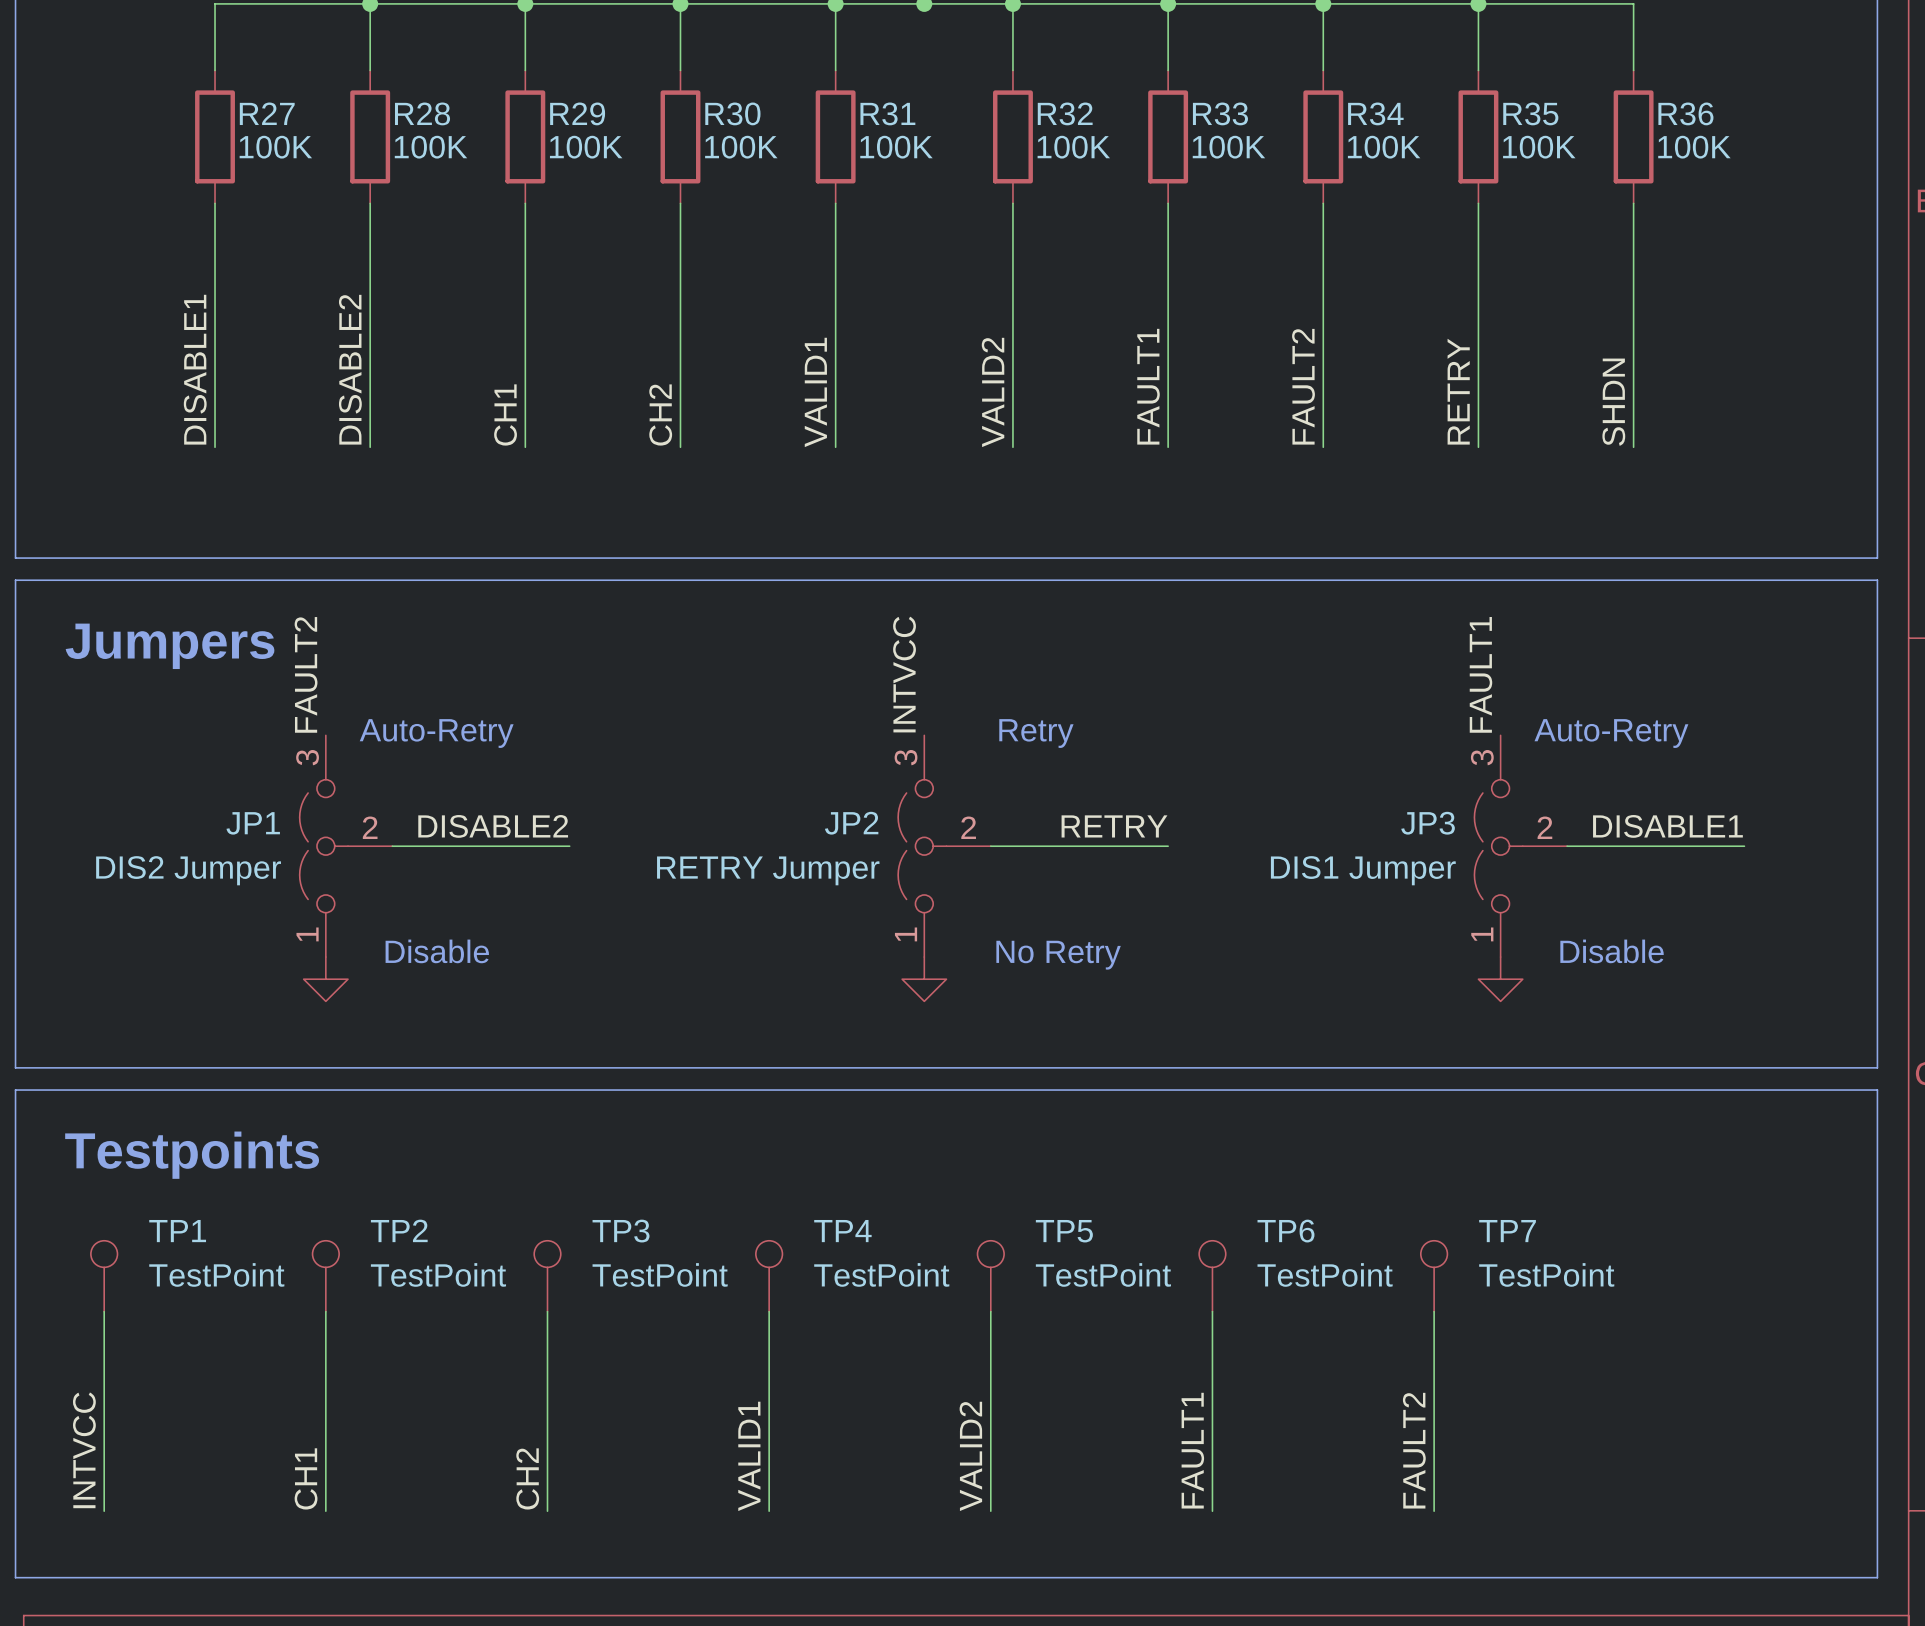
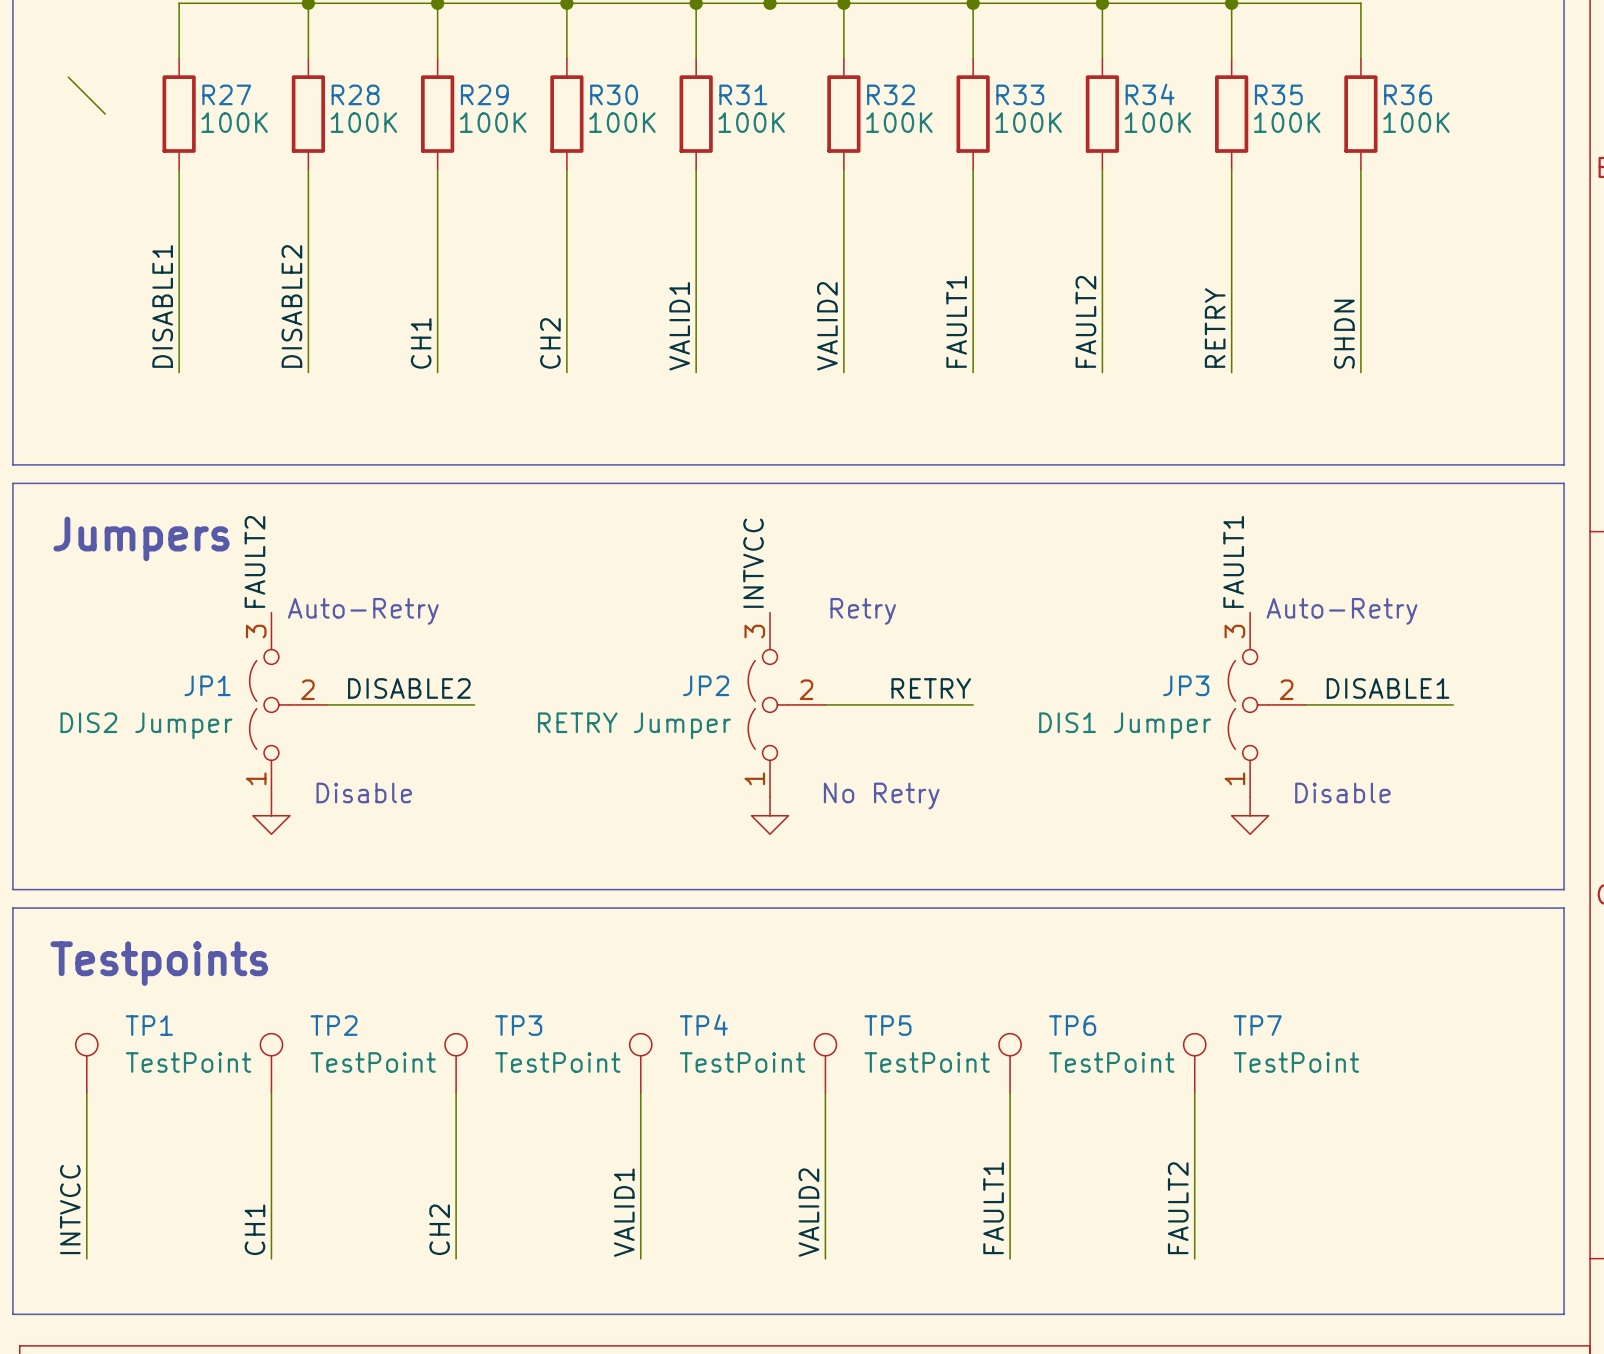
wire: none -> (68, 77) (105, 114)

